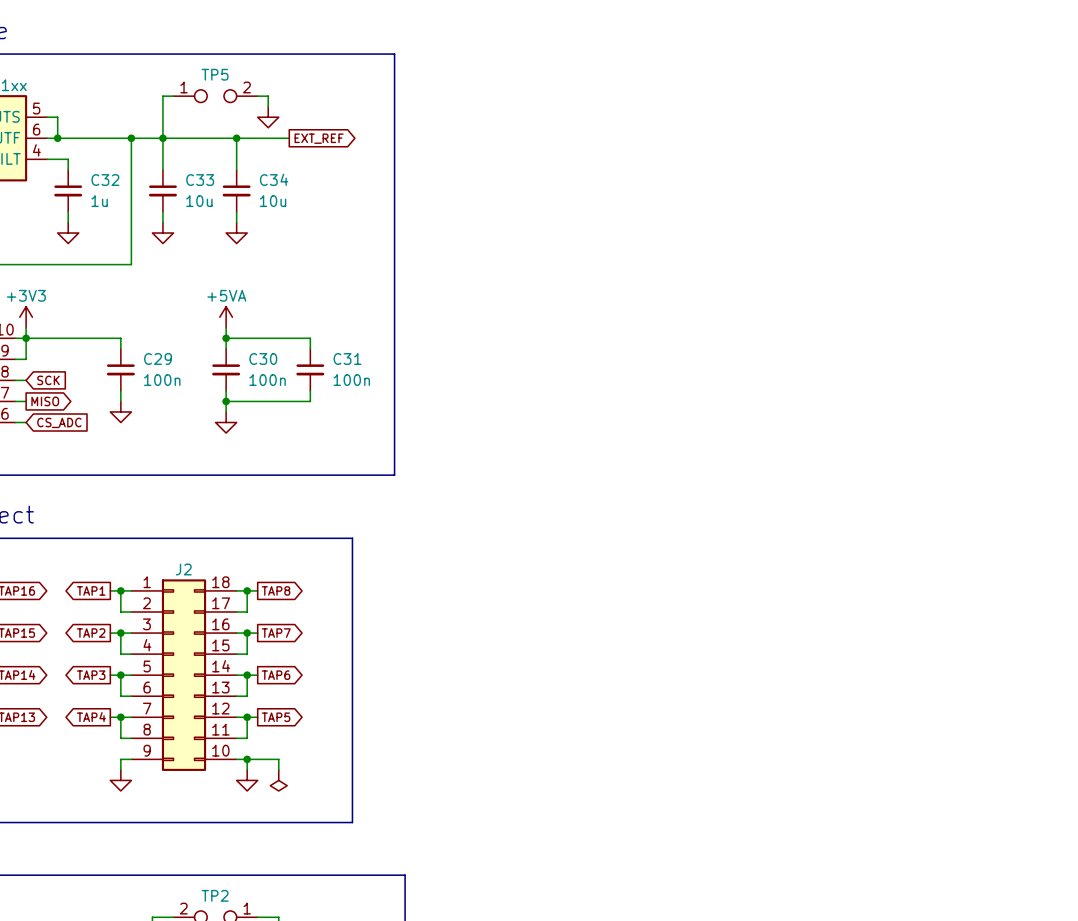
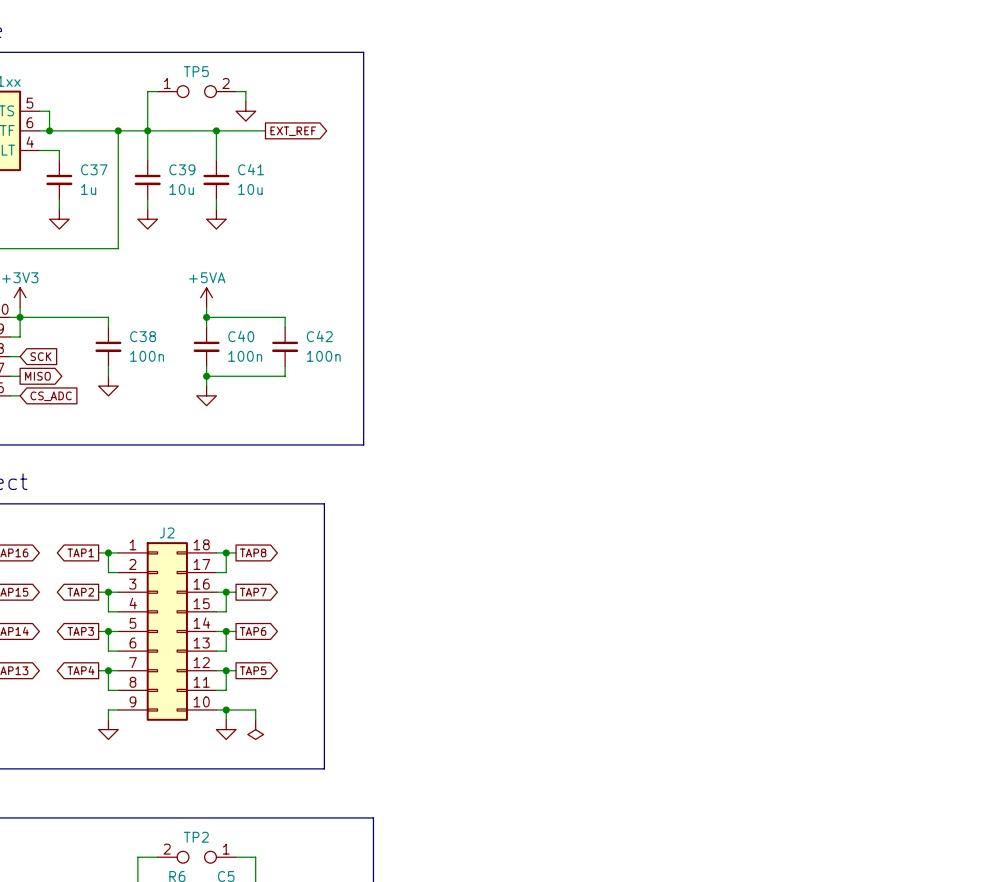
C34 name: C34 (274, 179) -> C41 (251, 169)
C32 name: C32 (105, 180) -> C37 (94, 169)
C33 name: C33 (200, 180) -> C39 (182, 169)
C29 name: C29 (158, 359) -> C38 (143, 336)
C30 name: C30 (263, 359) -> C40 (241, 336)
C31 name: C31 (347, 359) -> C42 (319, 336)

